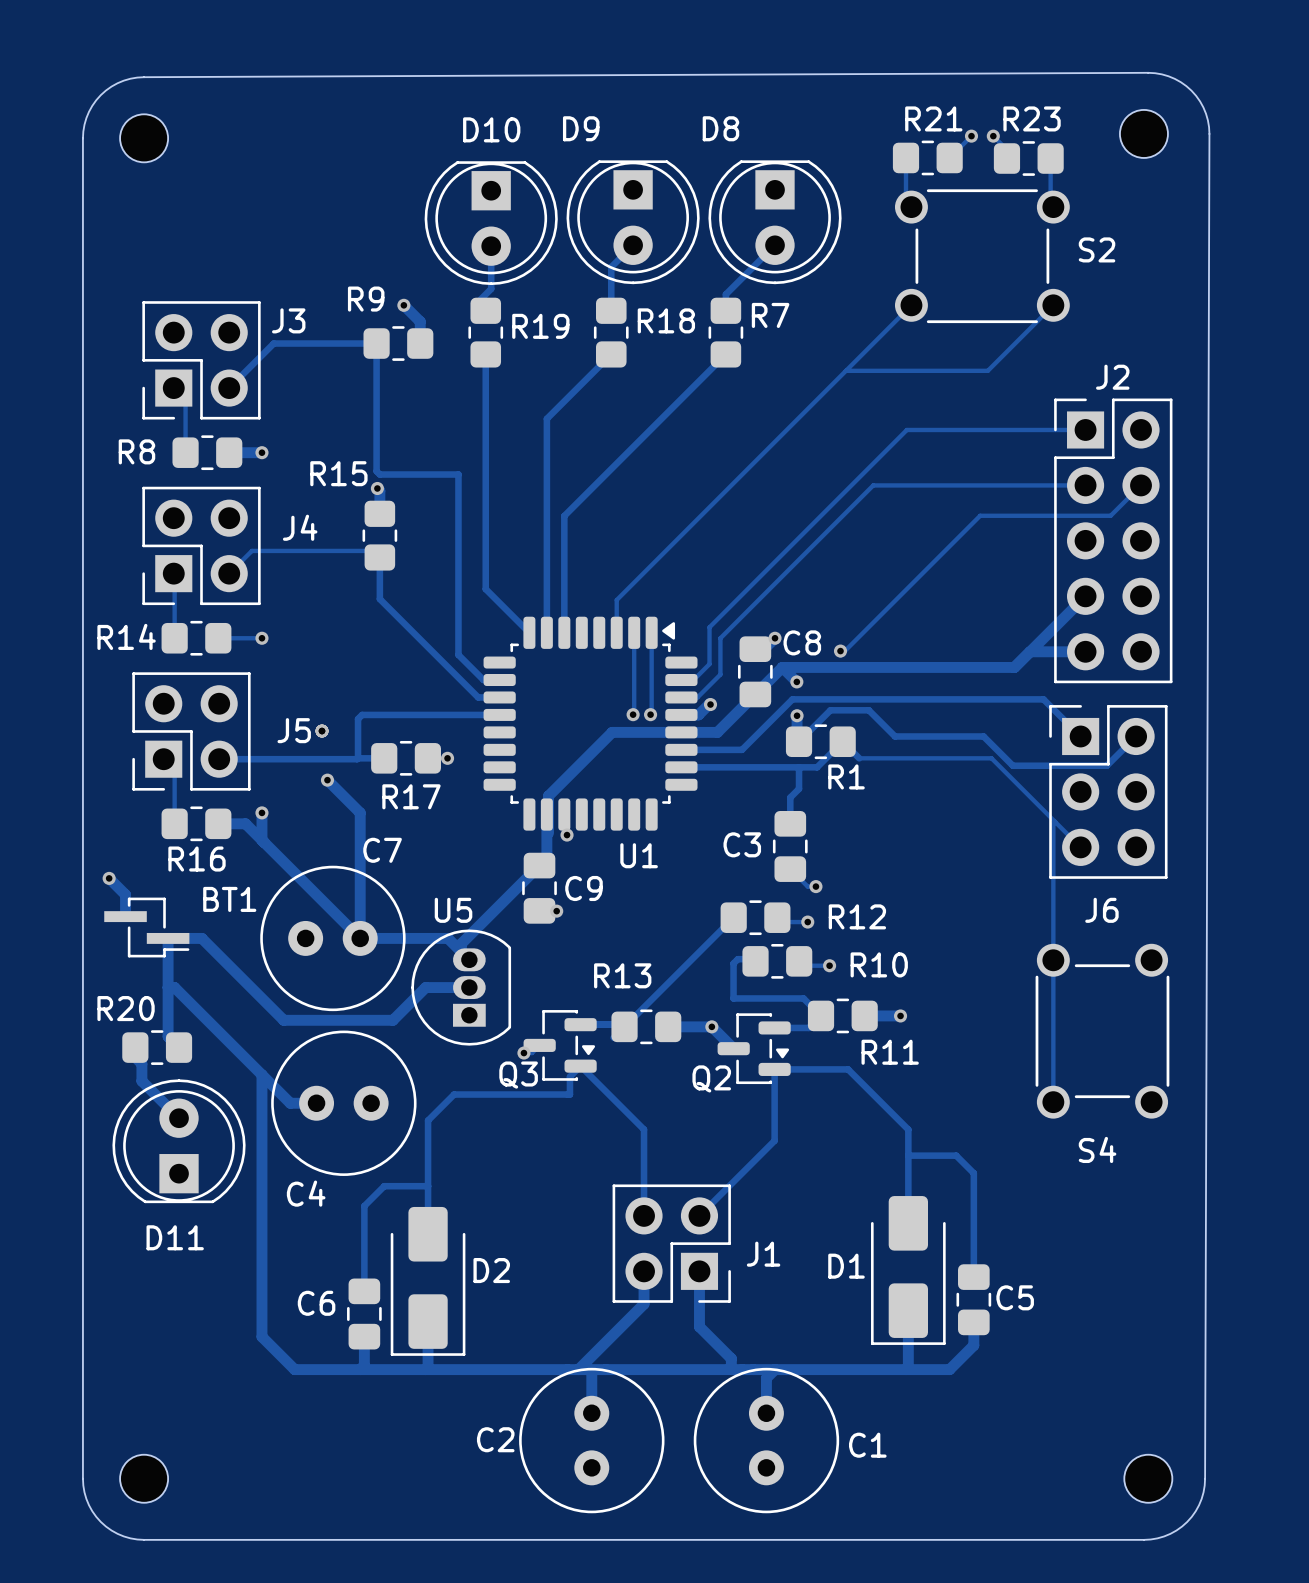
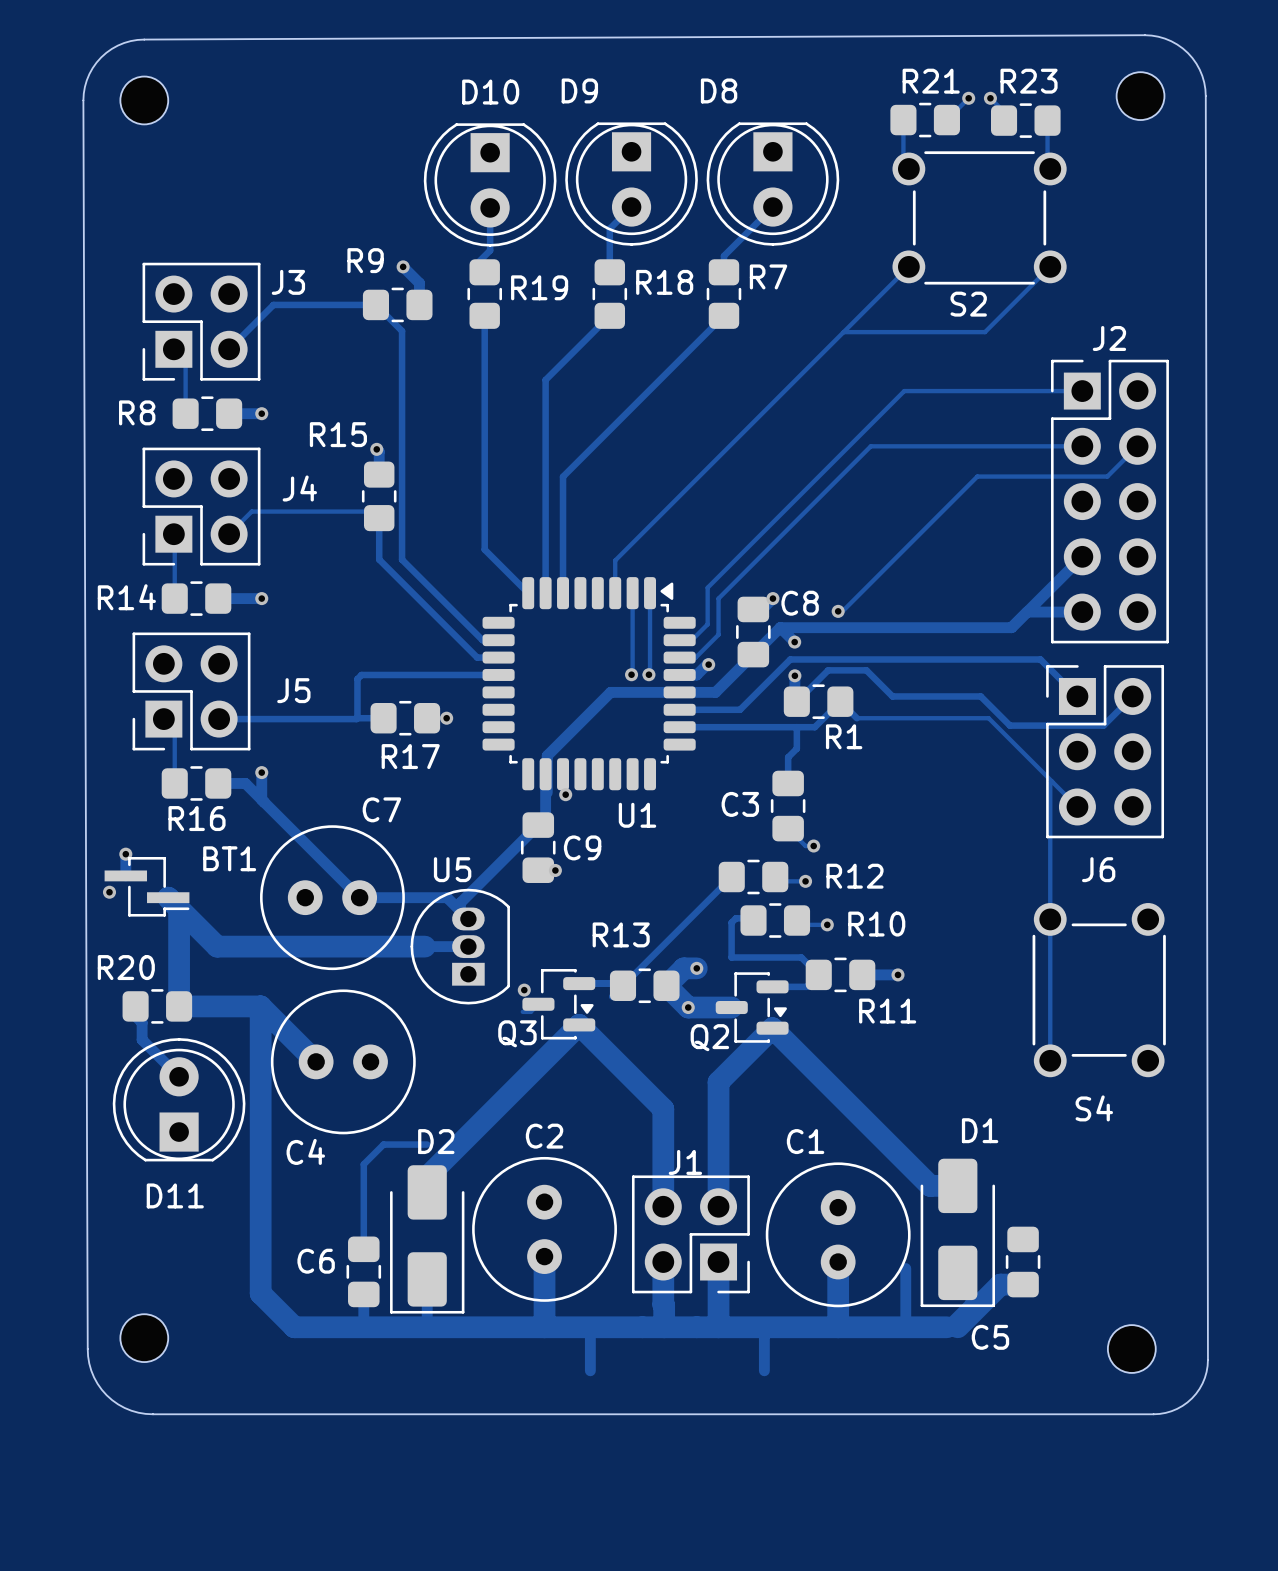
board edge: (1209, 133) (1205, 1478) (1201, 1498) (1195, 1511) (1187, 1521) (1170, 1533) (1157, 1538) (1143, 1539) (144, 1539) (130, 1538) (117, 1533) (105, 1526) (96, 1516) (86, 1498) (82, 1478) (82, 138) -> (1205, 96) (1207, 1359) (1204, 1377) (1192, 1398) (1171, 1411) (1153, 1414) (153, 1414) (138, 1412) (124, 1407) (112, 1400) (101, 1389) (91, 1370) (87, 1349) (83, 100)
S2 name position: S2 (1097, 249) -> S2 (968, 304)
track: (376, 343) (376, 471) (379, 474) (458, 474) (458, 654) -> (375, 304) (402, 331) (402, 559) (457, 615)
track width: thin (218, 638) (261, 638) -> thick (218, 598) (261, 598)
via: (322, 731) -> none
track: (327, 780) (360, 812) (360, 938) -> none
via: (327, 780) -> none
track: (109, 878) (125, 894) -> none
via position: (109, 878) -> (125, 854)
via: none -> (109, 892)
track: none -> (179, 908) (179, 1006) (260, 1006)
track: (168, 987) (174, 987) (290, 1103) (316, 1103) -> (260, 1006) (316, 1061)
track: (425, 987) (392, 1020) (283, 1020) (201, 938) (168, 938) (168, 1036) (179, 1047) -> (424, 946) (217, 946) (168, 897)
via: none -> (696, 968)
track: (668, 1026) (711, 1026) (733, 1048) -> (696, 968) (683, 968) (666, 985) (688, 1007) (731, 1007)
via: (711, 1026) -> none
via: none -> (688, 1007)
via position: (523, 1053) -> (524, 990)
track: (261, 1074) (261, 1336) -> (260, 1006) (261, 1294)
track: (569, 1076) (569, 1094) (454, 1094) (428, 1120) (428, 1218) -> (568, 1035) (427, 1176)
track width: thin (569, 1076) (580, 1066) (644, 1129) -> thick (568, 1035) (579, 1024) (642, 1088)
track: (644, 1129) (644, 1215) -> (642, 1088) (663, 1108) (663, 1206)
track: (908, 1155) (956, 1155) (973, 1173) (973, 1277) -> none
track: (699, 1215) (774, 1140) (774, 1069) (848, 1069) (908, 1129) (908, 1223) -> none
track: none -> (957, 1185) (930, 1185) (772, 1028) (718, 1082) (718, 1206)
J1 position: (671, 1243) -> (690, 1234)
J1 name position: J1 (763, 1254) -> J1 (685, 1162)
D1 name position: D1 (846, 1266) -> D1 (980, 1130)
D2 name position: D2 (491, 1270) -> D2 (436, 1141)
D1 position: (908, 1270) -> (957, 1232)
track: (644, 1271) (644, 1304) (578, 1369) -> none
track: (699, 1271) (699, 1326) (731, 1358) (731, 1369) -> none
C5 name position: C5 (1015, 1297) -> C5 (990, 1337)
track: none -> (544, 1256) (544, 1327)
C5 position: (973, 1299) -> (1023, 1262)
track: none -> (663, 1262) (664, 1327)
track: none -> (718, 1262) (718, 1327)
track: none -> (838, 1262) (838, 1327)
track: none -> (1023, 1284) (1000, 1284) (957, 1327)
track width: thin (261, 1336) (294, 1369) (949, 1369) -> thick (261, 1294) (294, 1327) (946, 1327)
C2 name position: C2 (495, 1439) -> C2 (544, 1136)
C2 position: (591, 1440) -> (544, 1229)
C1 position: (766, 1440) -> (838, 1234)
C1 name position: C1 (867, 1445) -> C1 (805, 1141)
part position: (144, 1478) -> (144, 1338)
part position: (1148, 1478) -> (1131, 1349)

